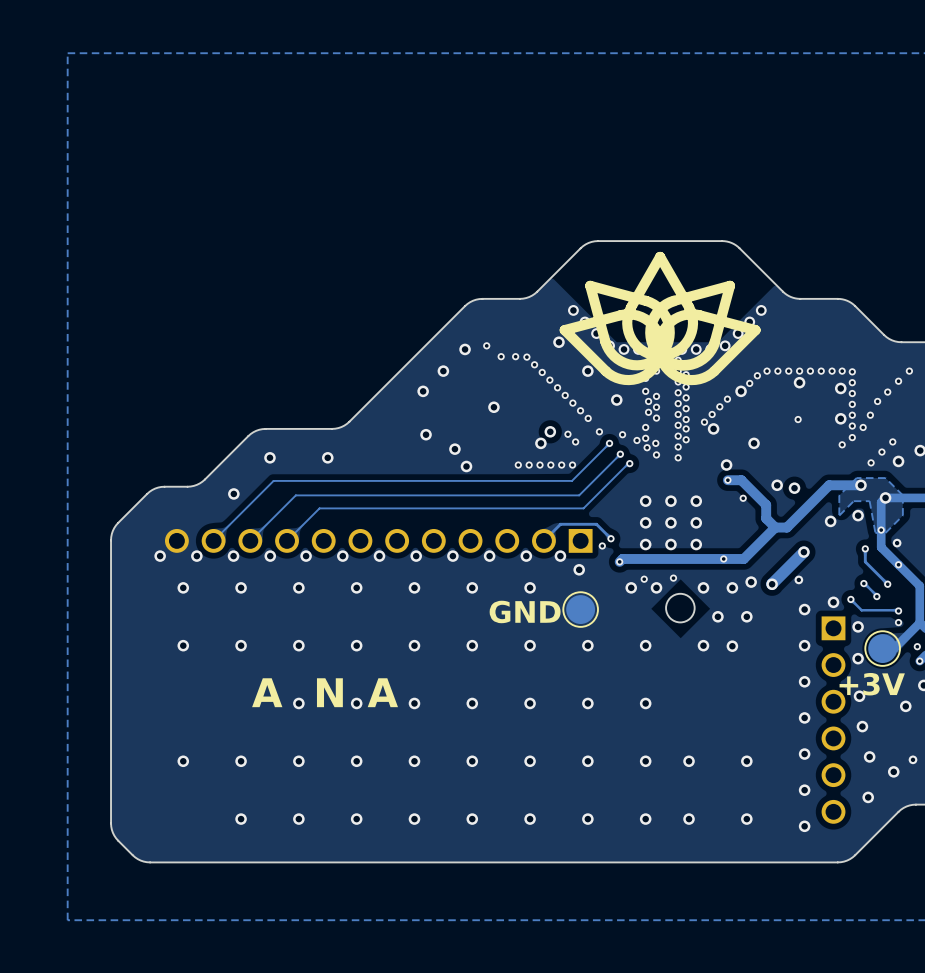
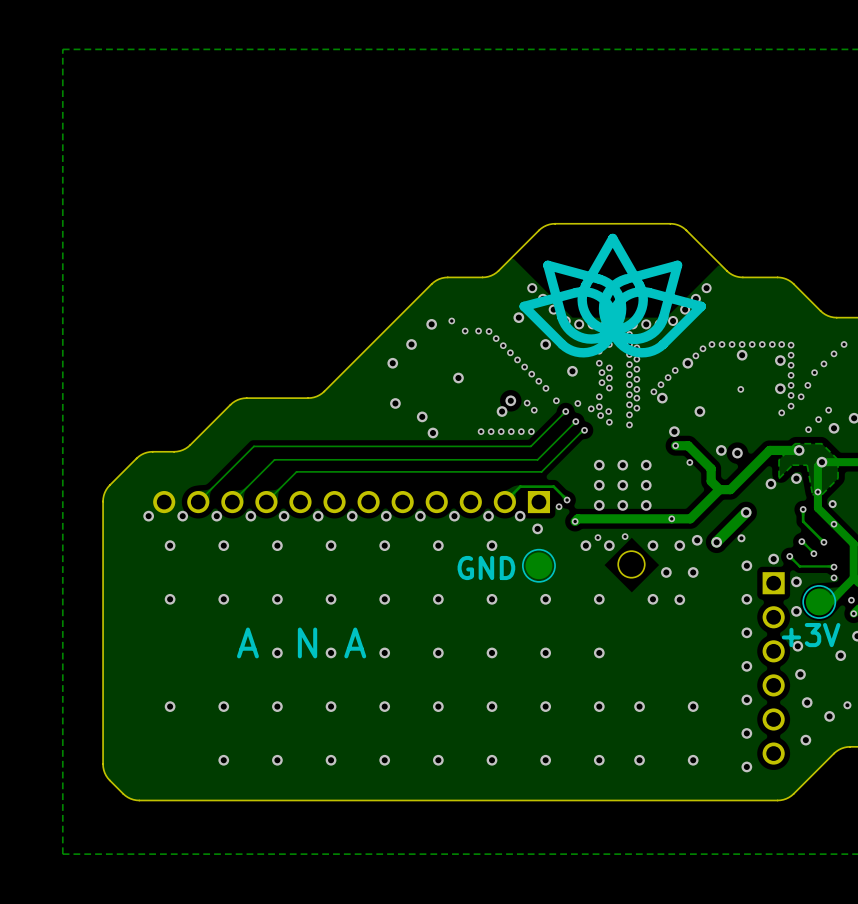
via: (269, 457) -> none
via: (327, 457) -> none
via: (233, 493) -> none

